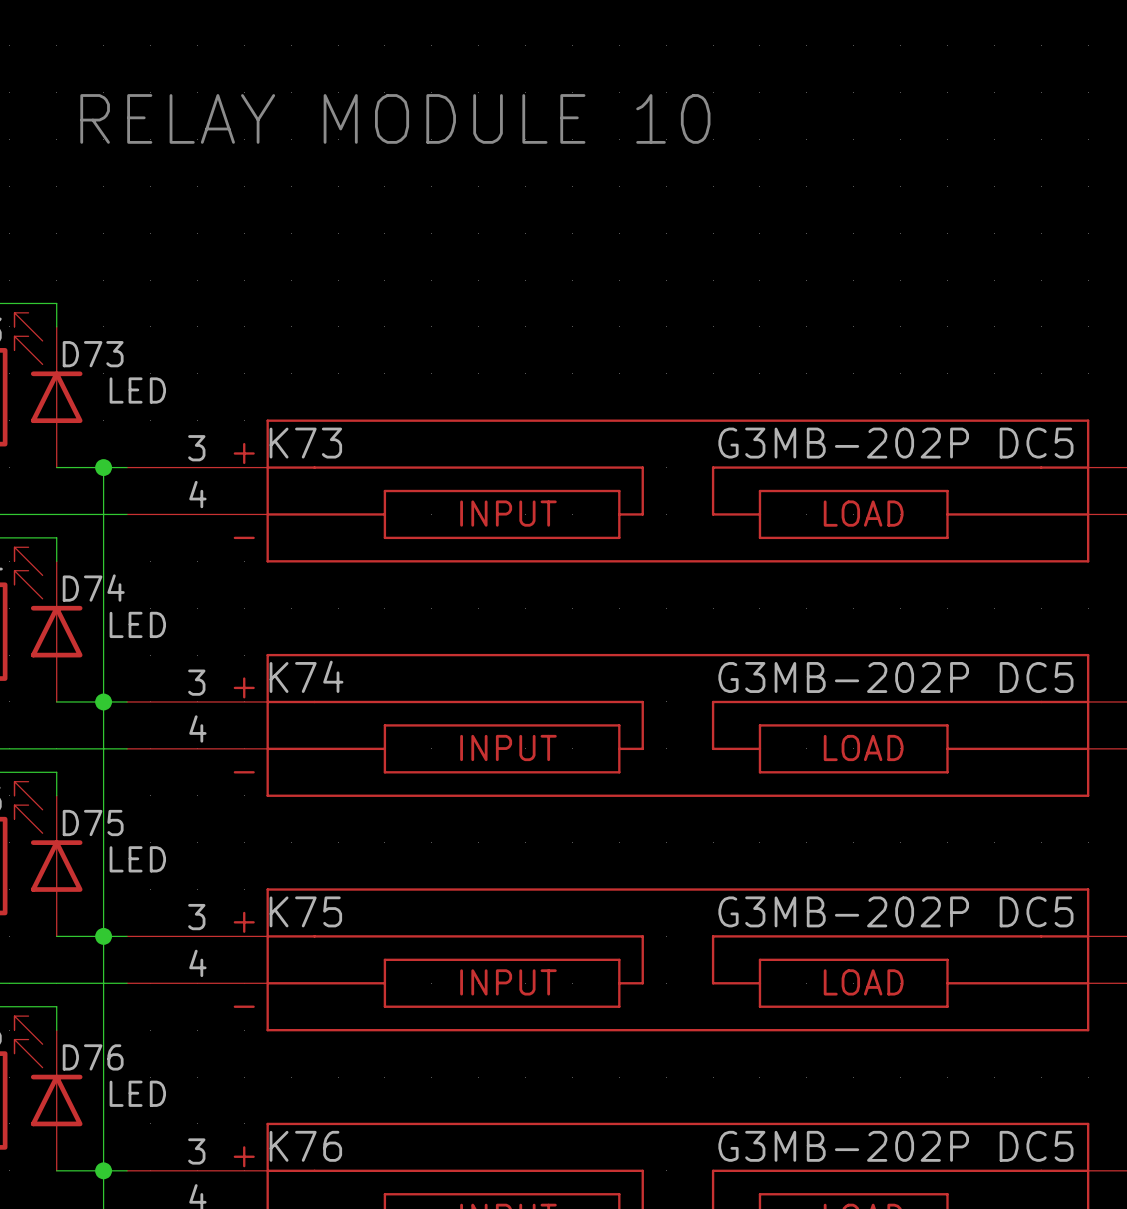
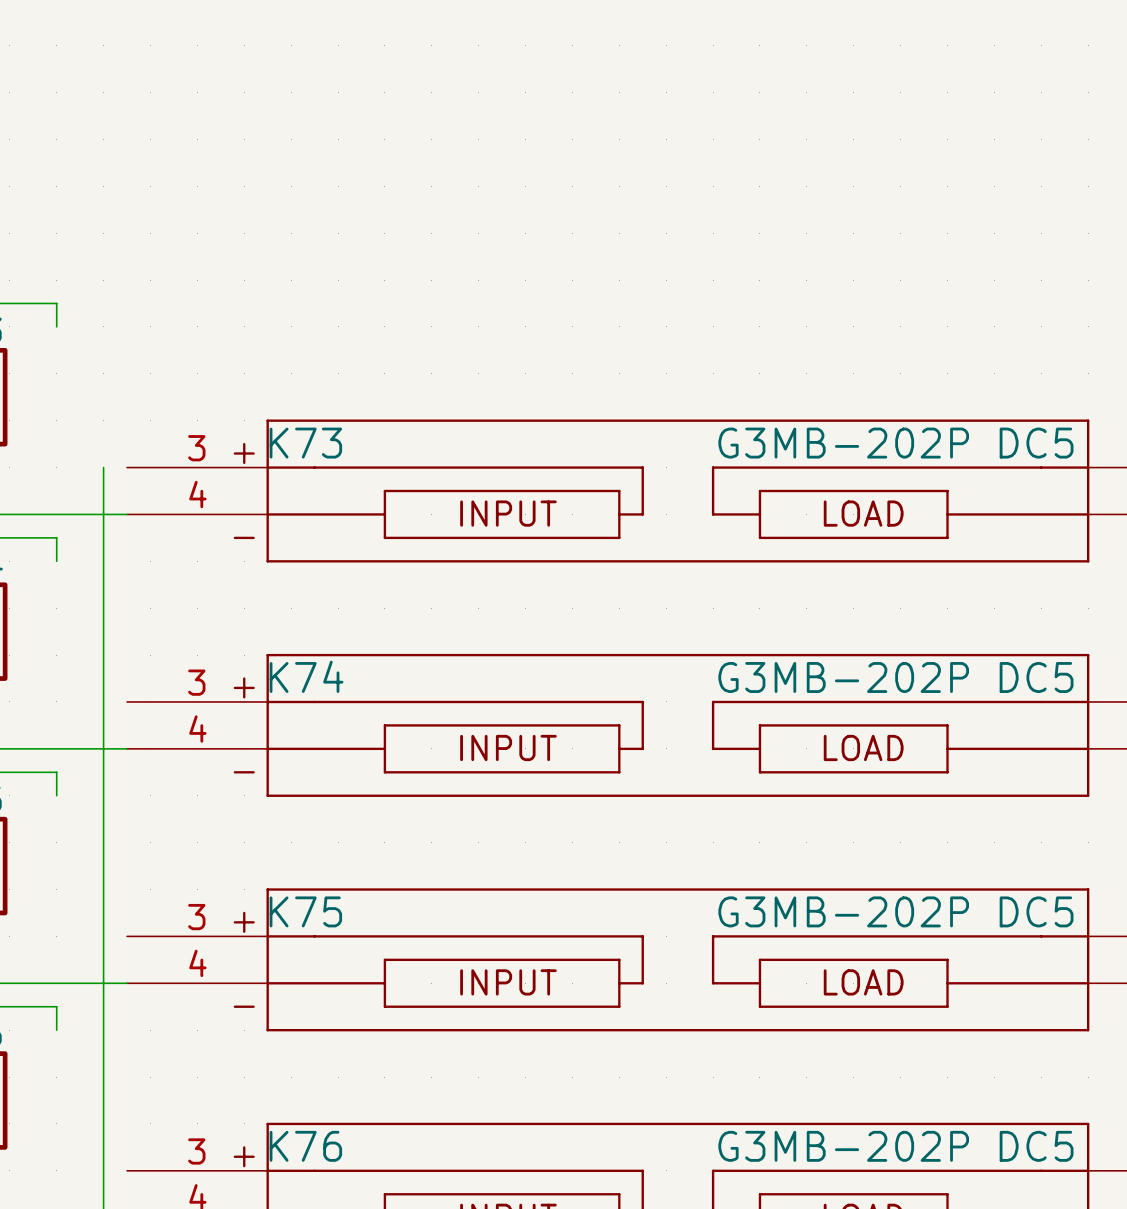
text: RELAY MODULE 10 (395, 118) -> none
D73: LED (48, 390) -> none
wire: (56, 467) (127, 467) -> none
junction: (103, 467) -> none
D74: LED (48, 624) -> none
wire: (56, 701) (127, 701) -> none
junction: (103, 701) -> none
D75: LED (48, 859) -> none
wire: (56, 936) (127, 936) -> none
junction: (103, 936) -> none
D76: LED (48, 1093) -> none
wire: (56, 1170) (127, 1170) -> none
junction: (103, 1170) -> none

